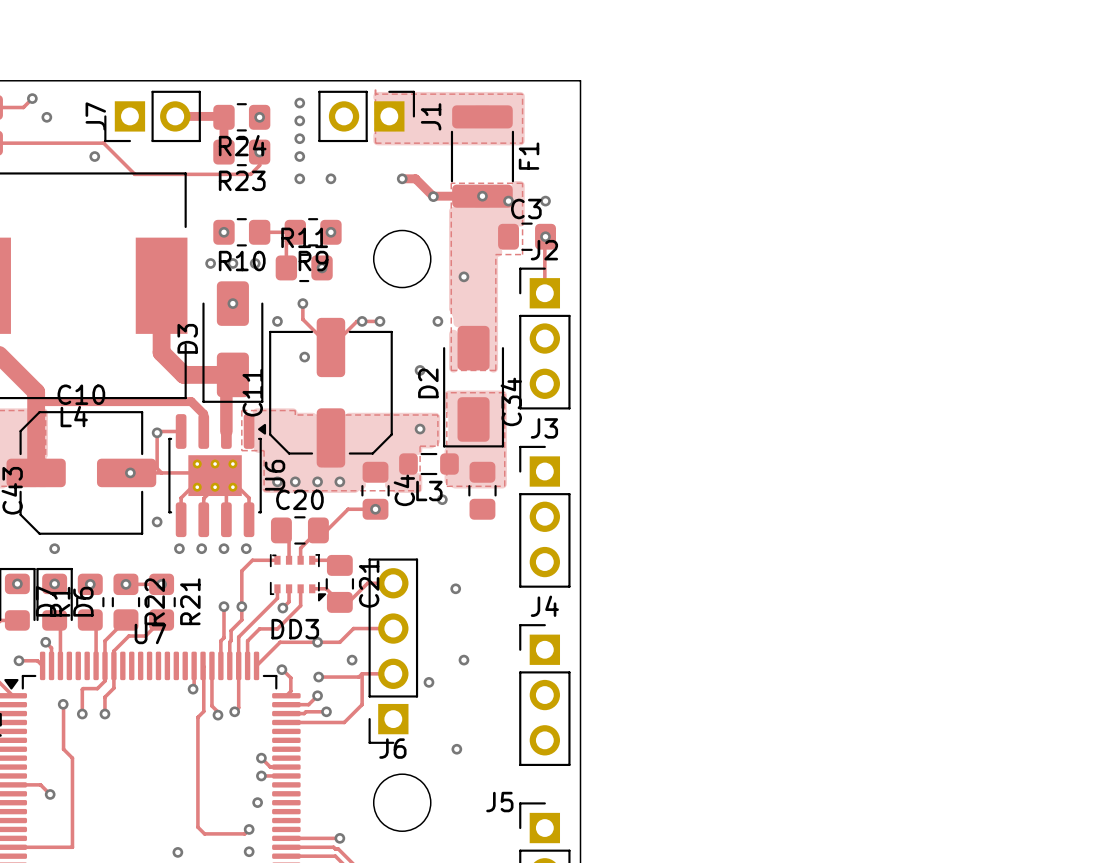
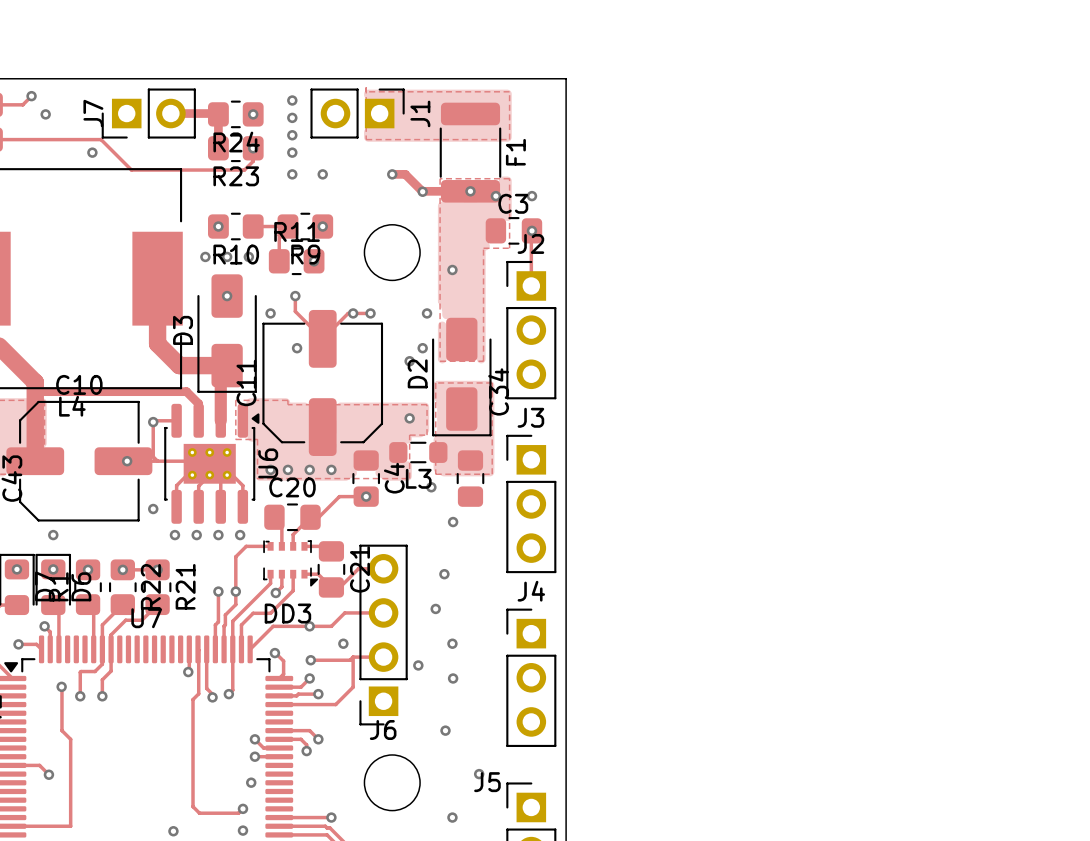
via: none -> (422, 348)
via: none -> (453, 522)
via: none -> (435, 608)
via: none -> (453, 678)
track: none -> (279, 730) (309, 730) (318, 739)
track: none -> (279, 739) (301, 739) (306, 744) (306, 751)
via: none -> (318, 739)
via: none -> (306, 751)
via: none -> (479, 774)
via: none -> (452, 817)

